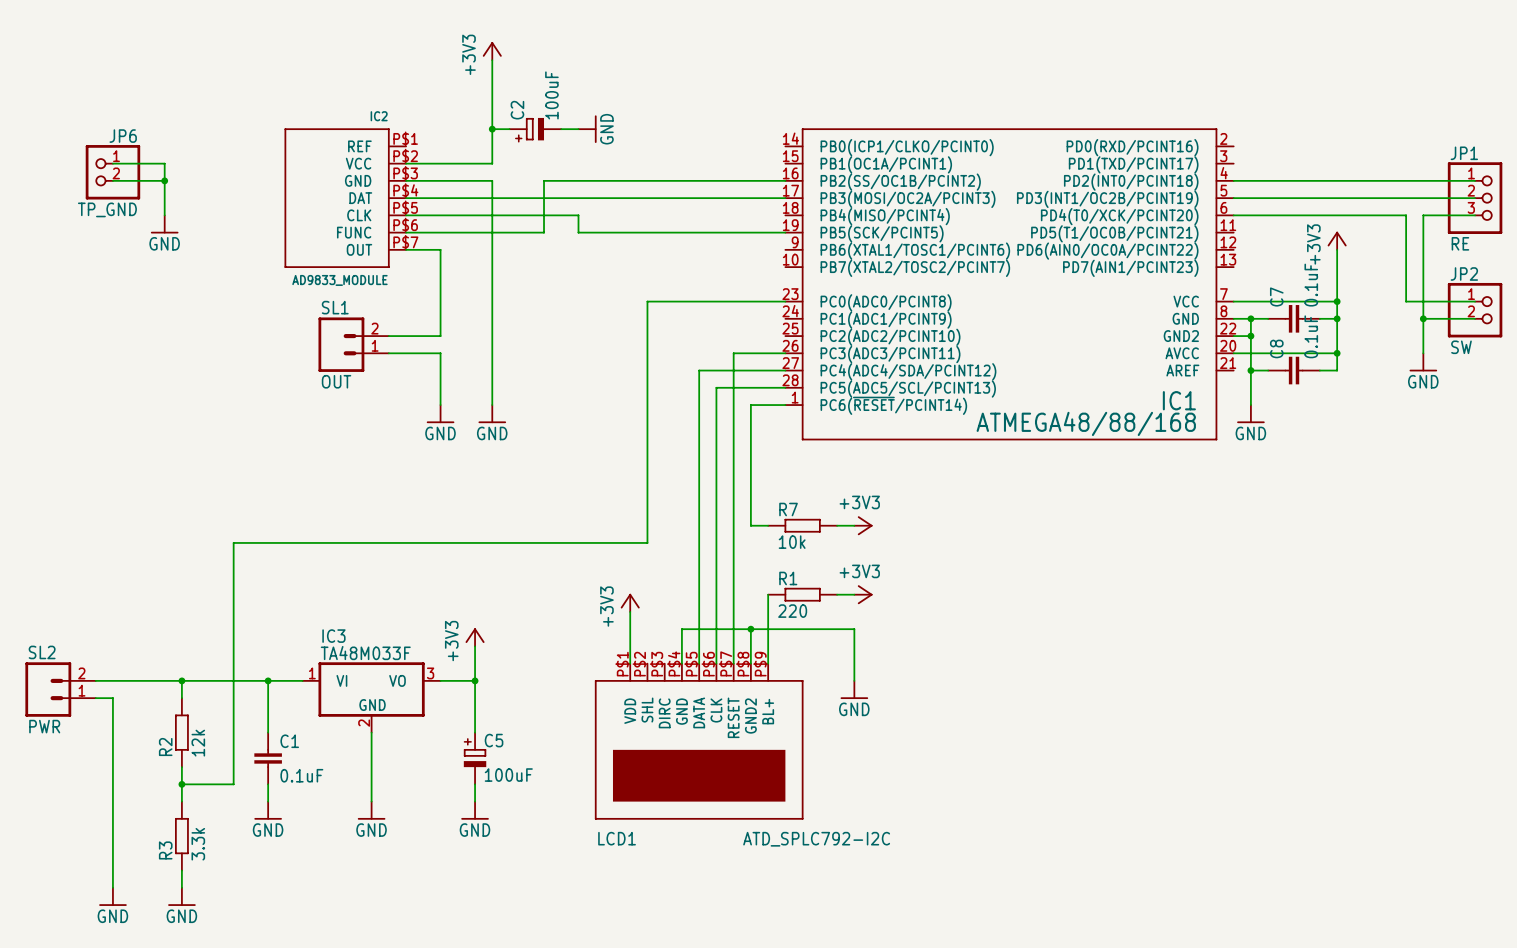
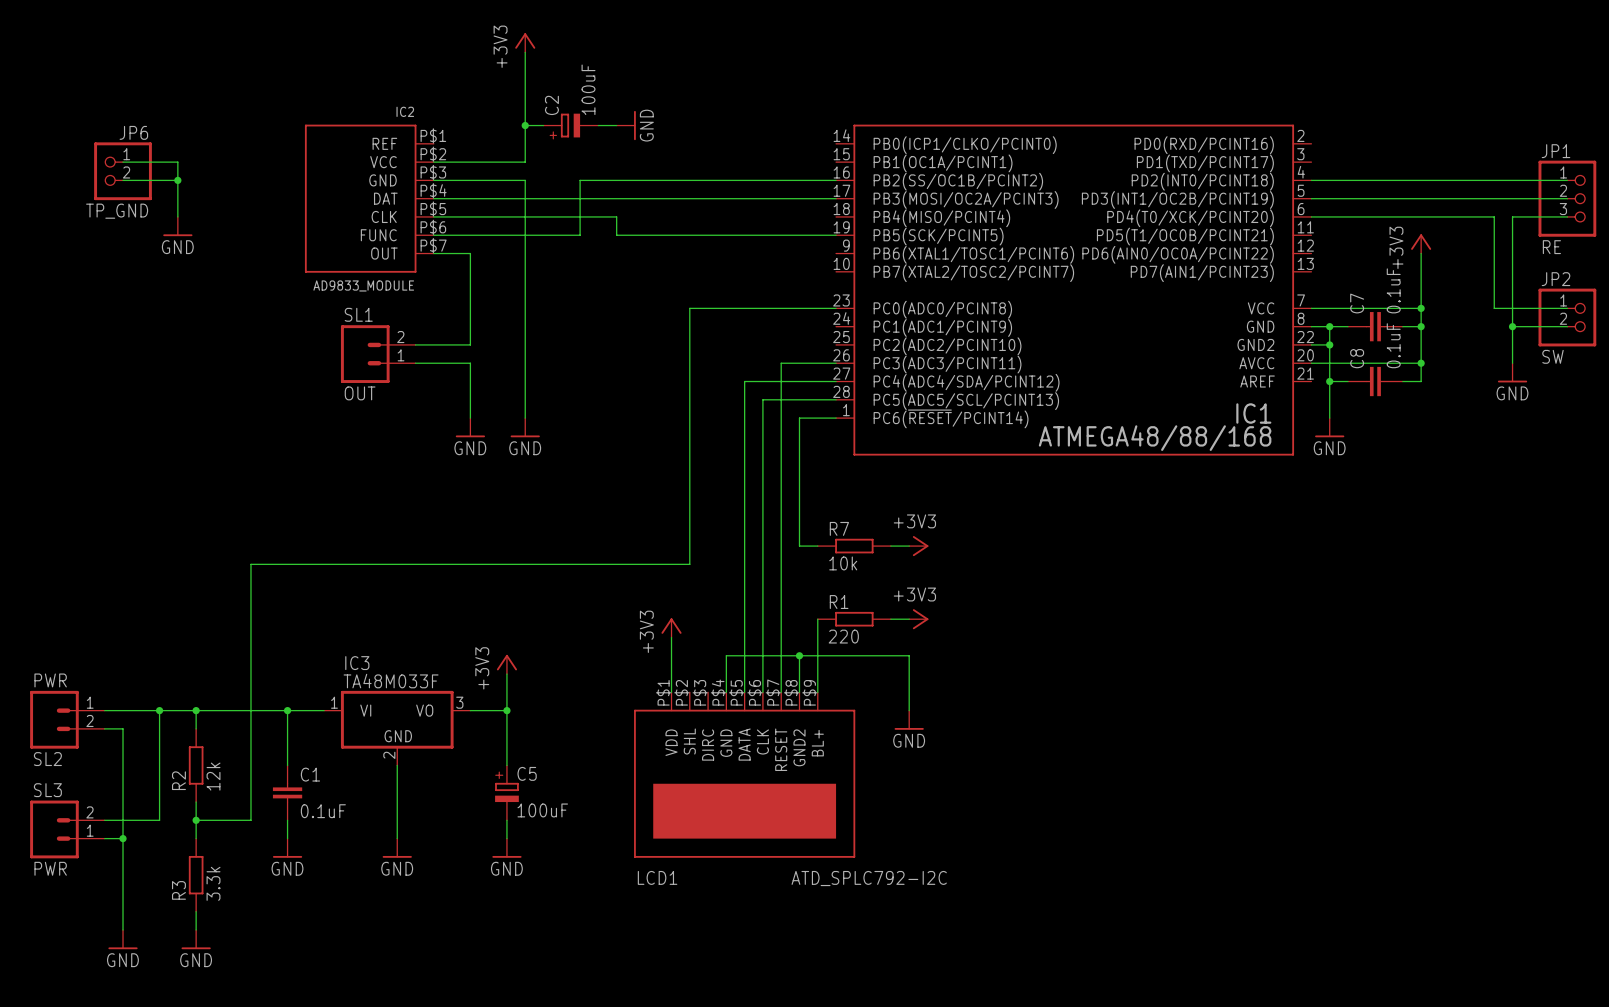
wire: none -> (159, 710) (159, 820) (104, 820)
junction: none -> (159, 710)
SL2 flip: as is (48, 689) -> up-down (54, 719)
SL3: none -> PWR (67, 829)
wire: none -> (104, 838) (123, 838)
junction: none -> (123, 838)

